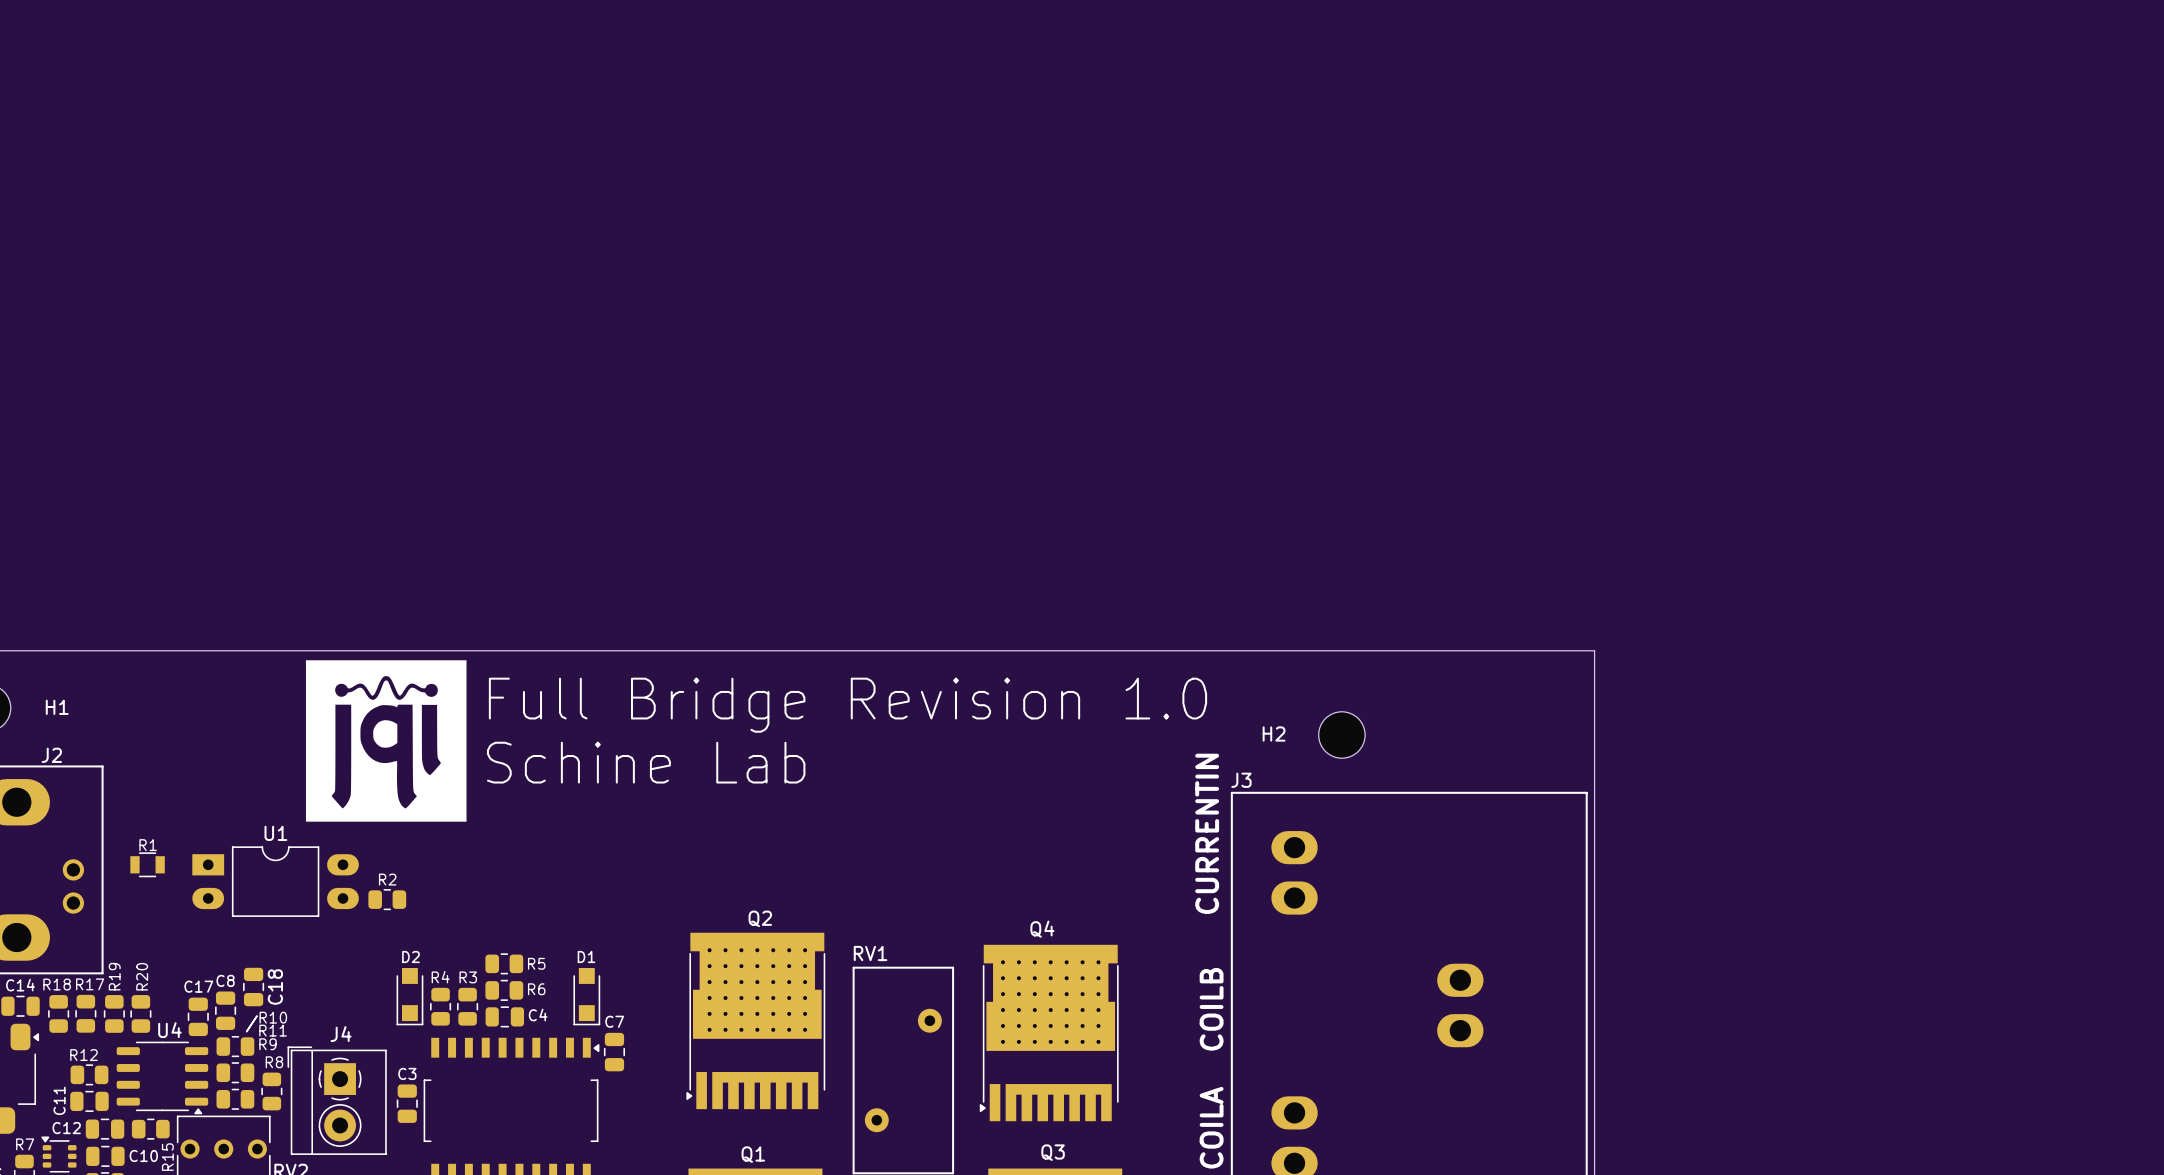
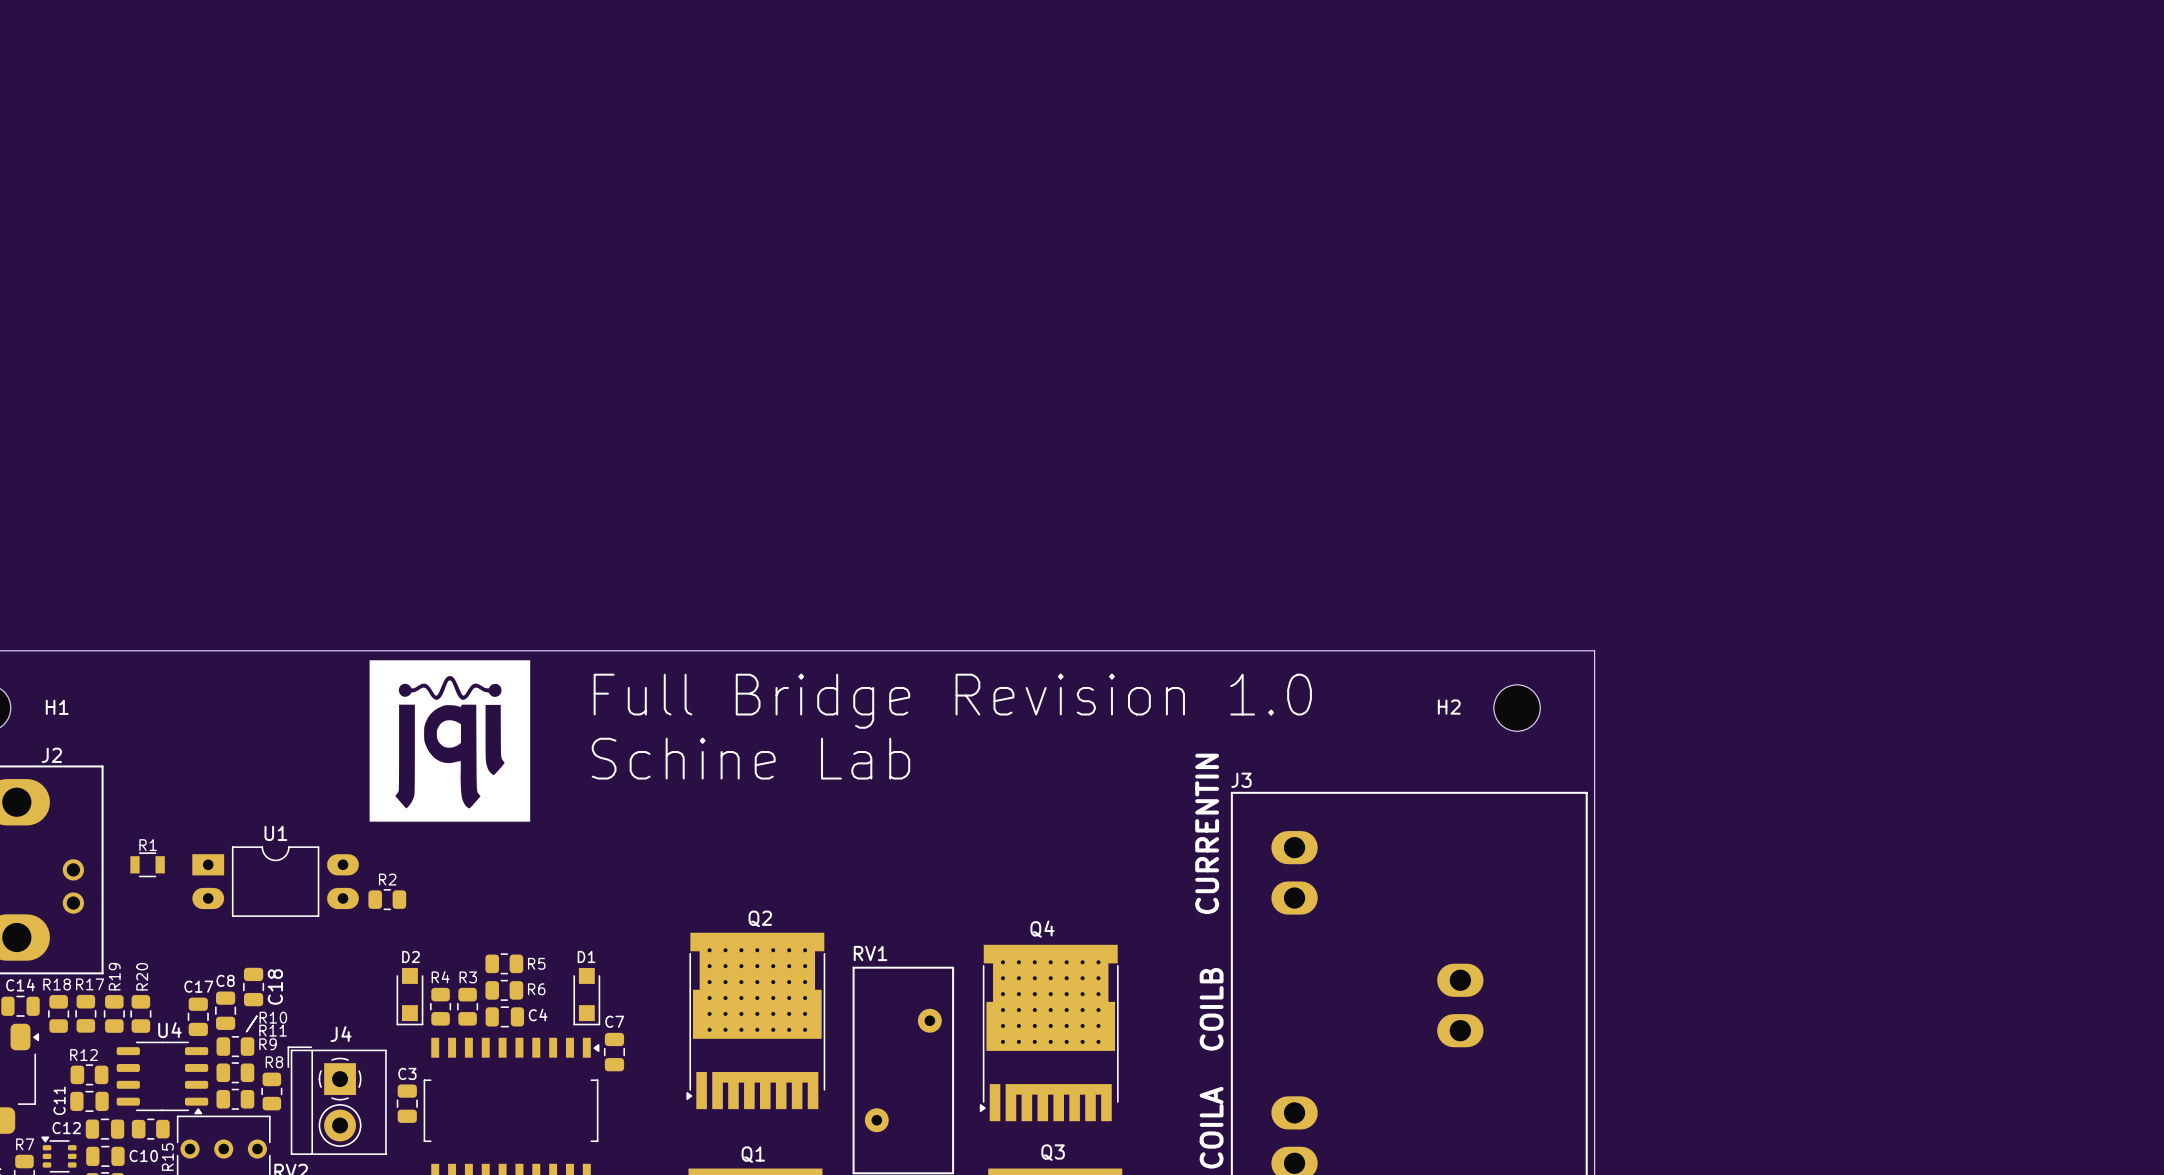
text position: Full Bridge Revision 1.0 (847, 705) -> Full Bridge Revision 1.0 (952, 701)
H2 position: (1341, 735) -> (1517, 708)
drawing position: (386, 740) -> (449, 740)
text position: Schine Lab (646, 762) -> Schine Lab (750, 758)

